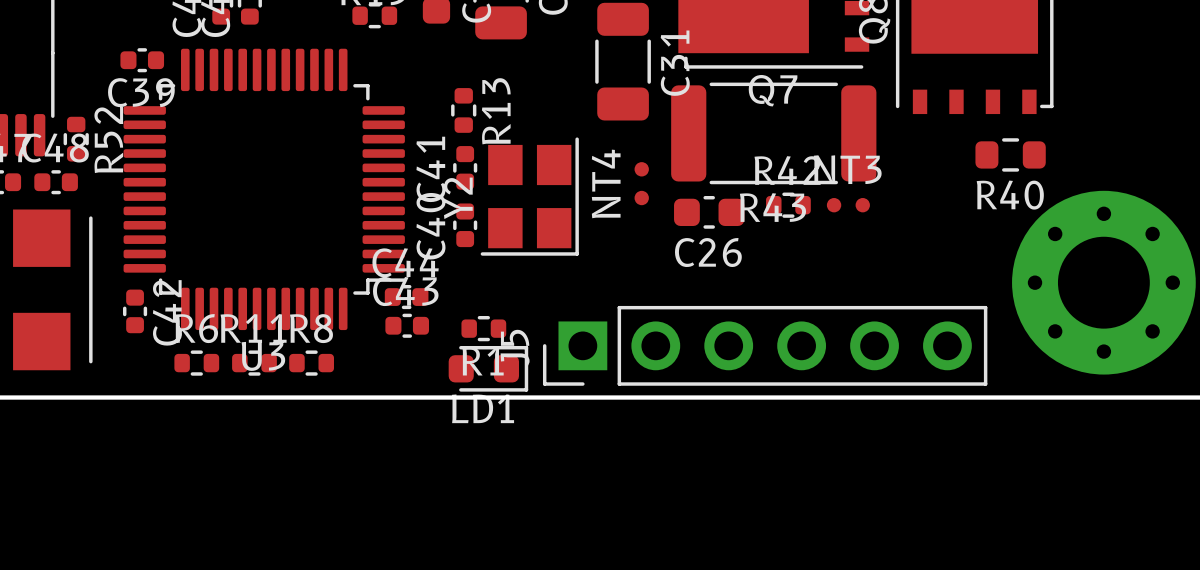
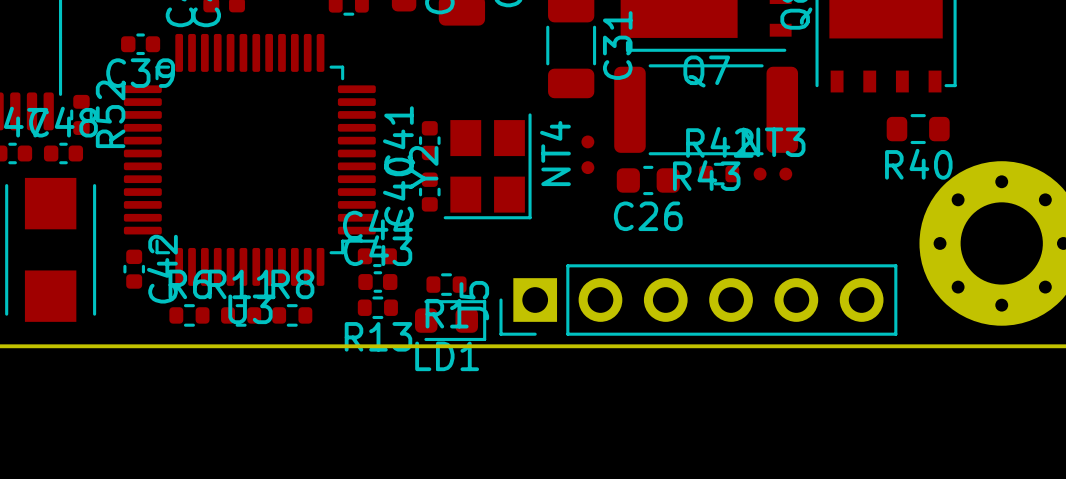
R13 rotation: 0° (463, 110) -> 90° clockwise (377, 307)
R13 position: (463, 110) -> (377, 307)

